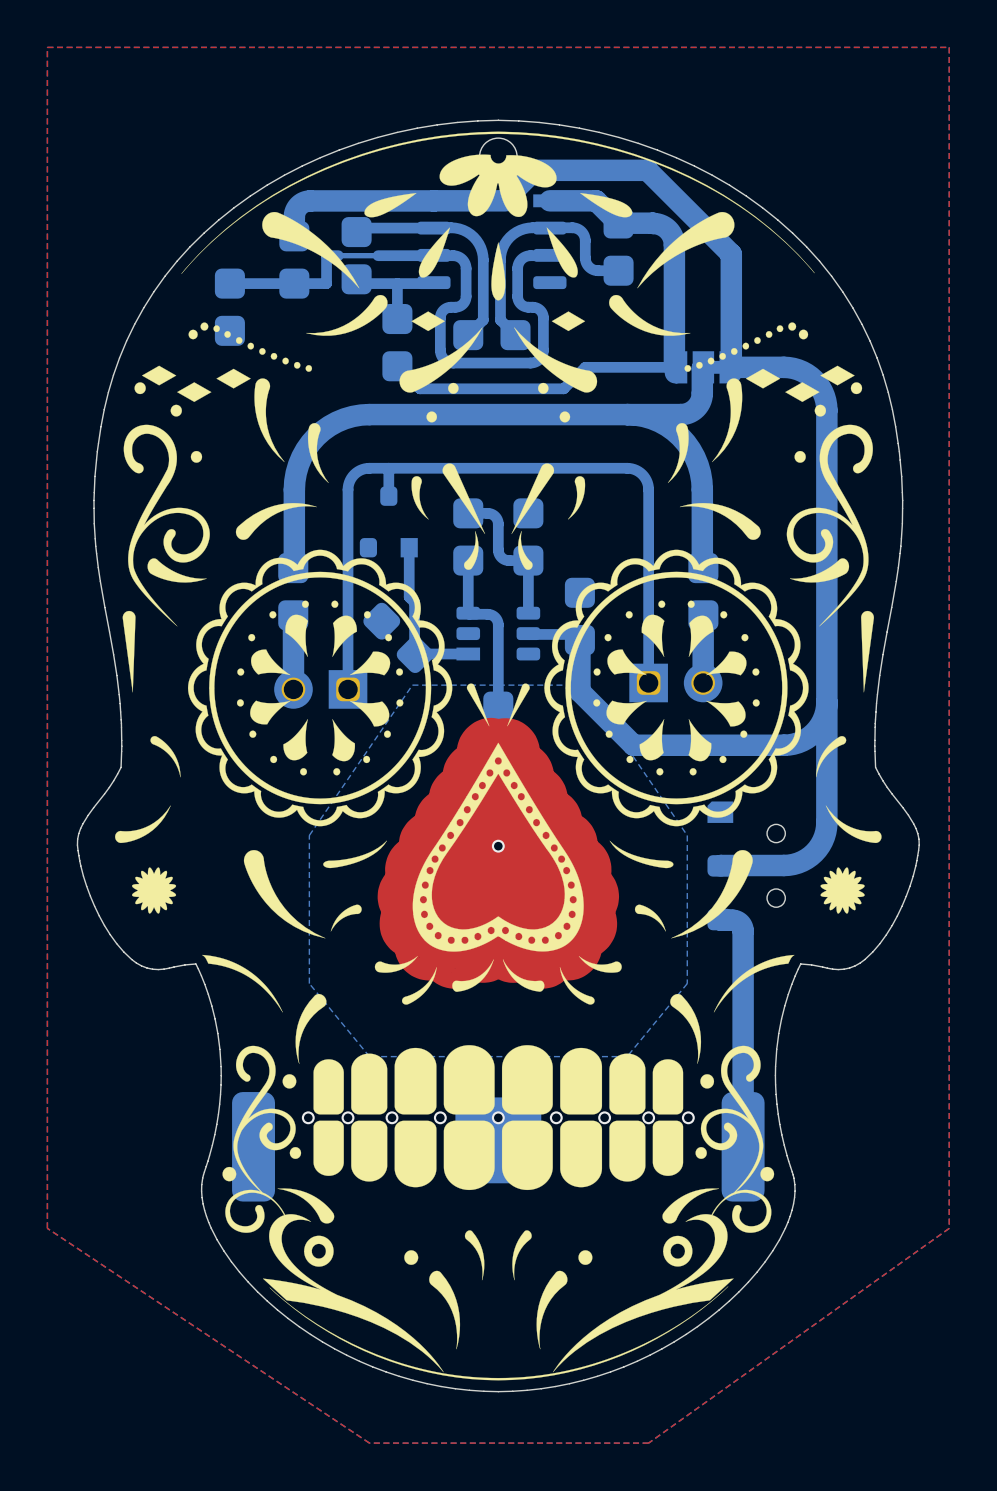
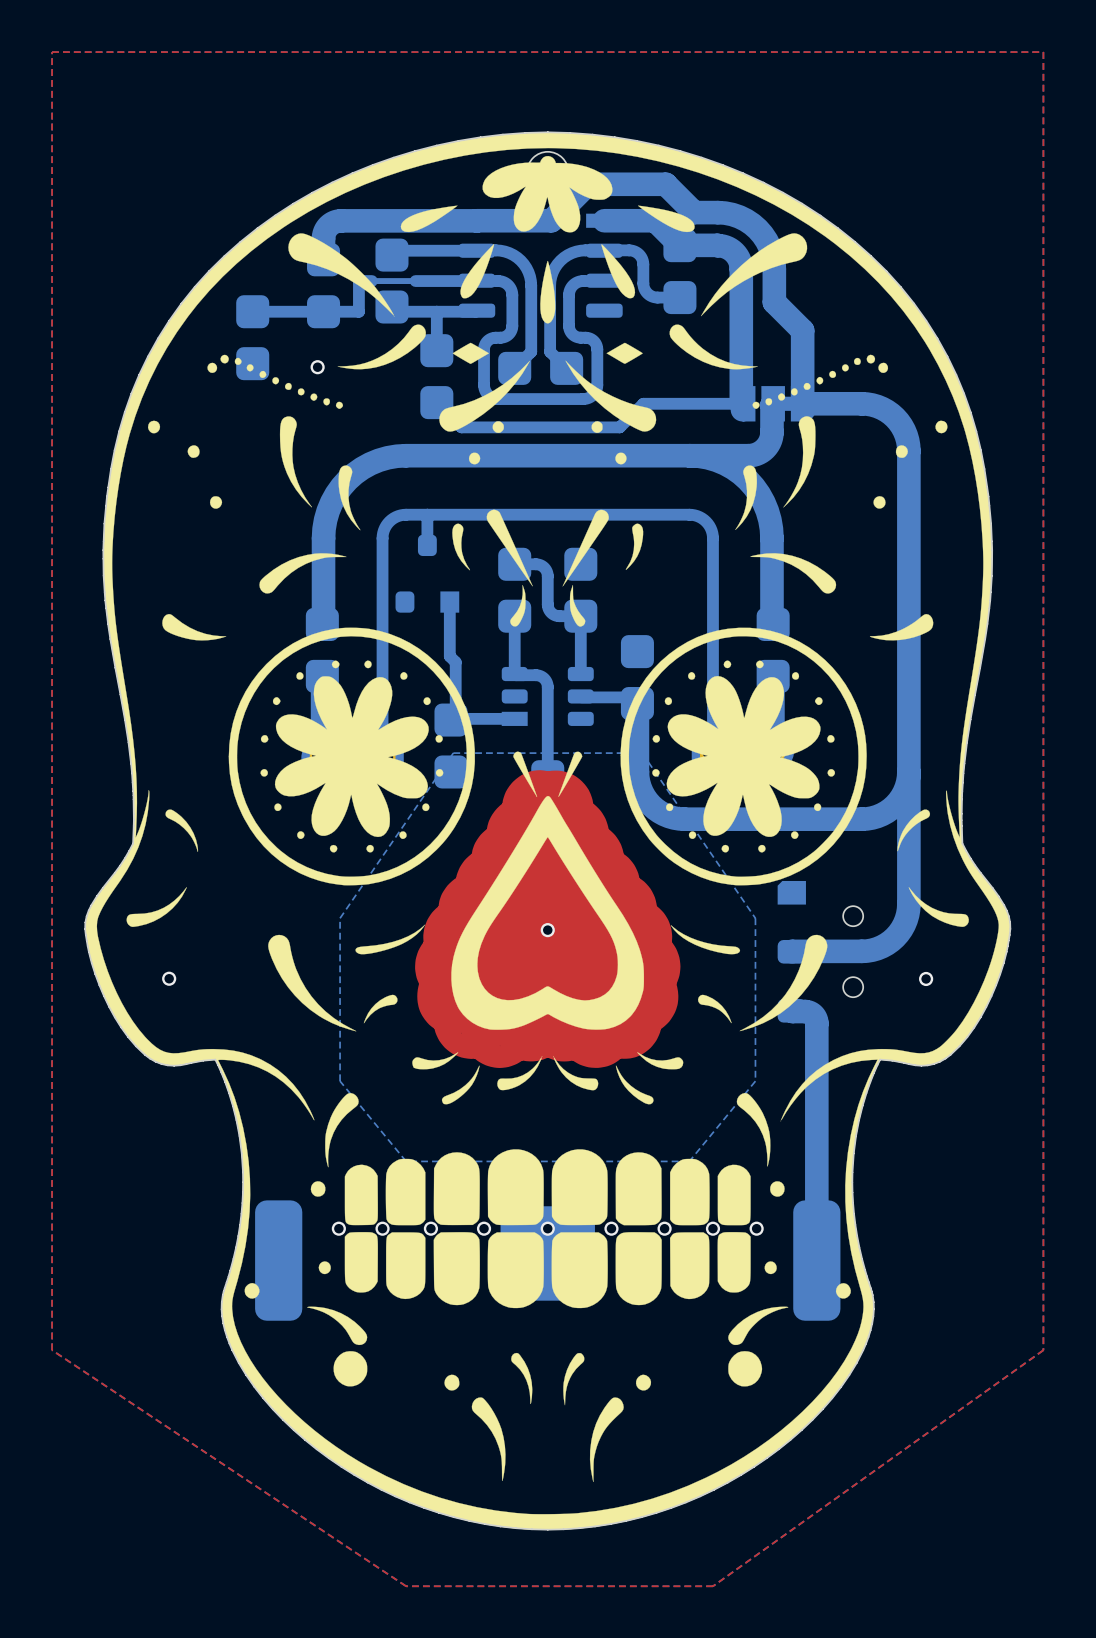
drawing: none -> [85, 132, 1011, 1530]
bottom track: (501, 200) (505, 200) (535, 170) (647, 170) (731, 254) (731, 367) -> (551, 220) (587, 184) (665, 184) (694, 212) (732, 214) (752, 224) (766, 240) (772, 254) (774, 302) (802, 330) (803, 403)
via: none -> (317, 367)
part: (398, 637) -> none
part: none -> (450, 746)
bottom track: (579, 691) (633, 745) -> (637, 760) (640, 787) (651, 805) (669, 816) (696, 819)
part: (498, 755) -> none
part: none -> (547, 919)

